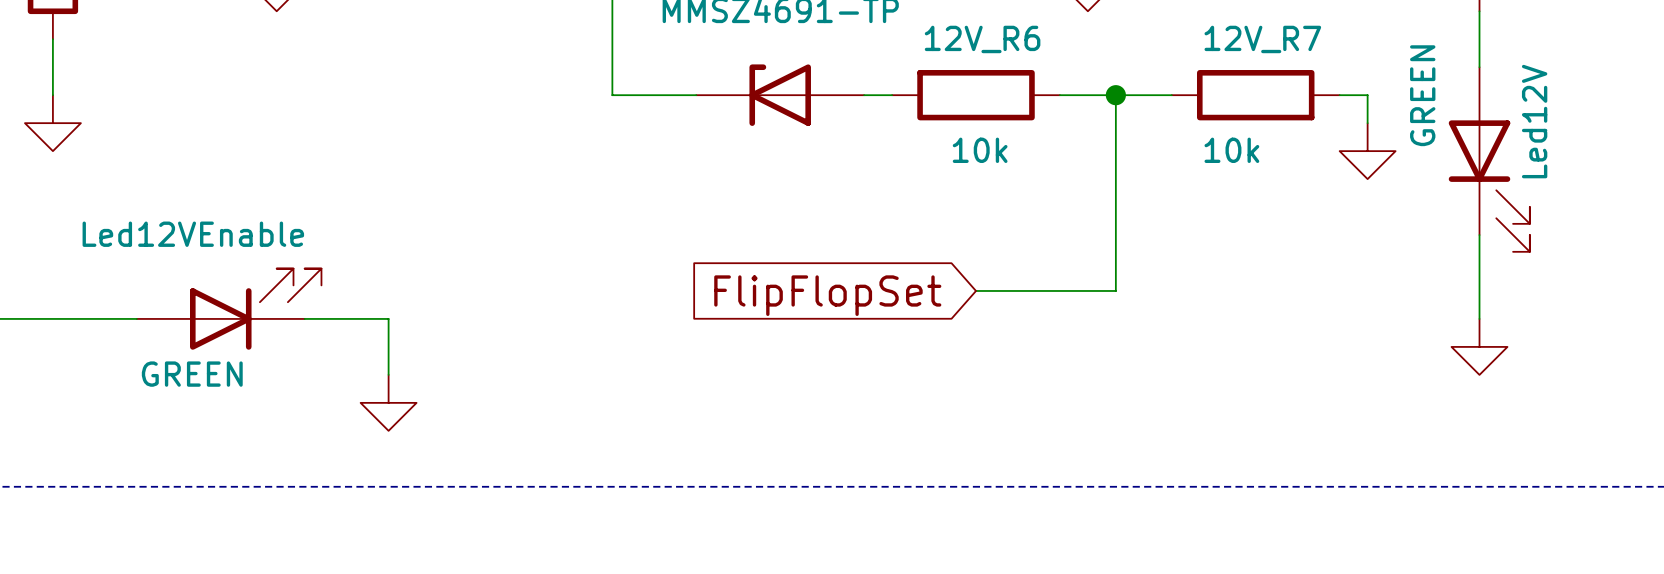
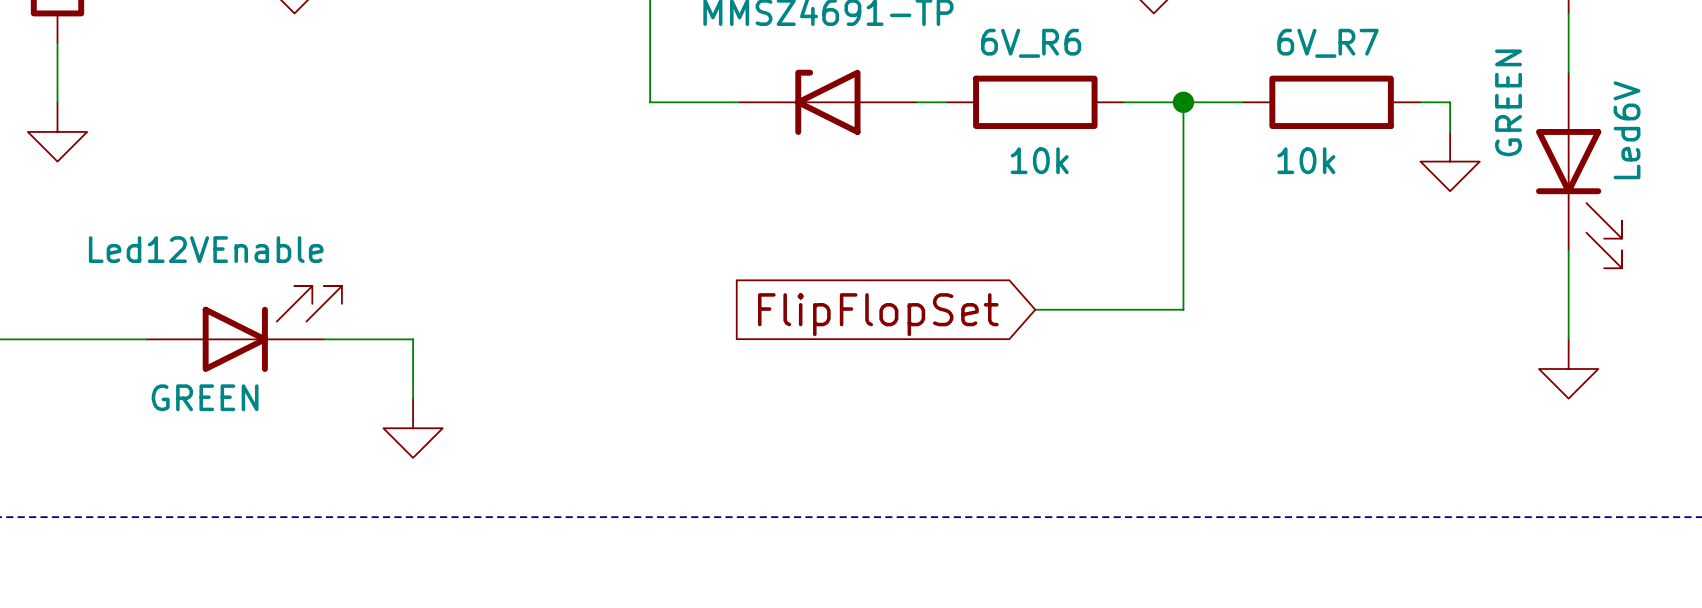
12V_R6 name: 12V_R6 (982, 39) -> 6V_R6 (1031, 43)
12V_R7 name: 12V_R7 (1262, 39) -> 6V_R7 (1328, 43)
Led12V name: Led12V (1534, 121) -> Led6V (1627, 130)

